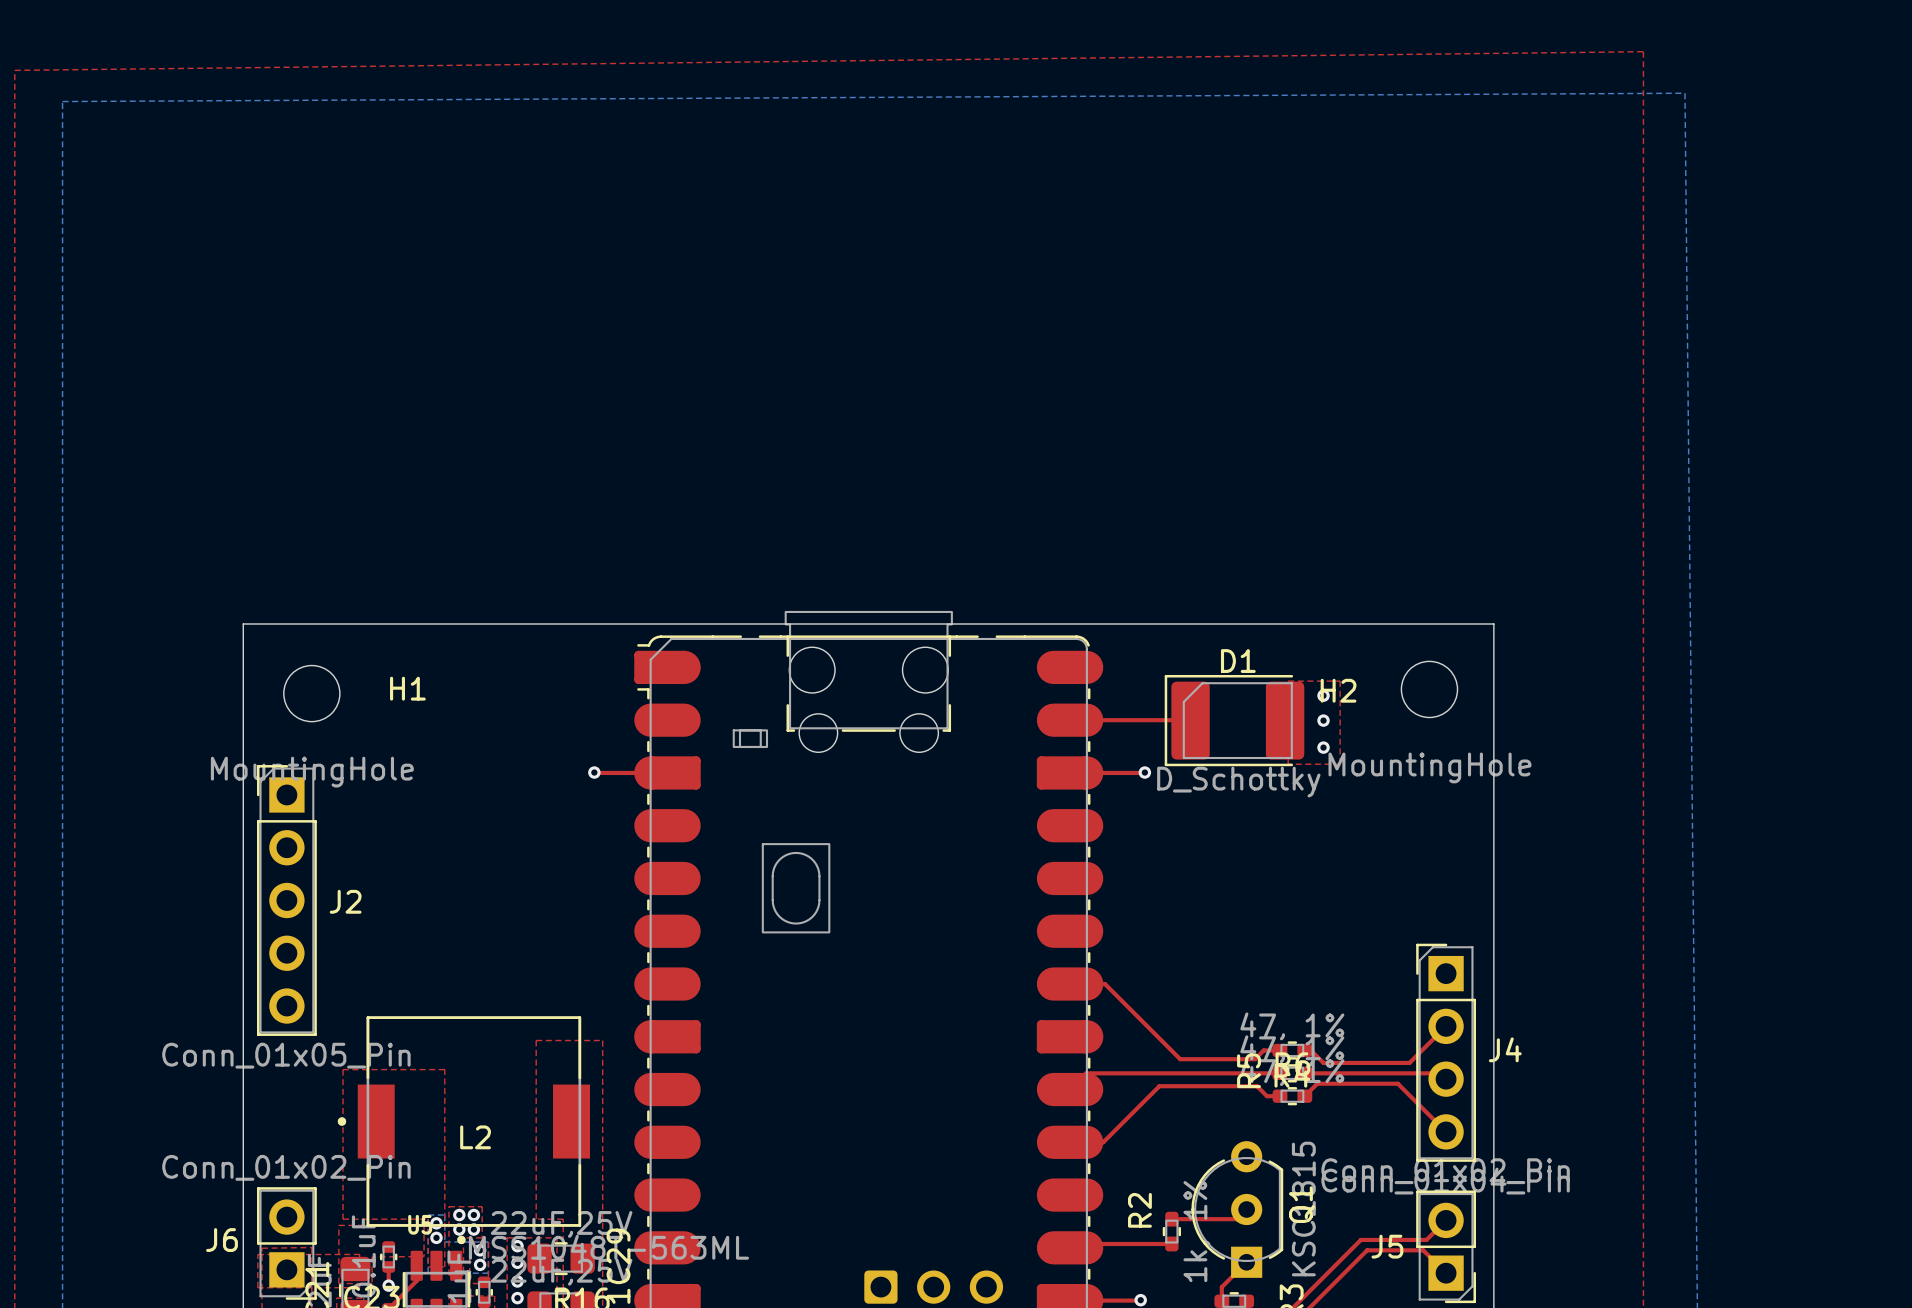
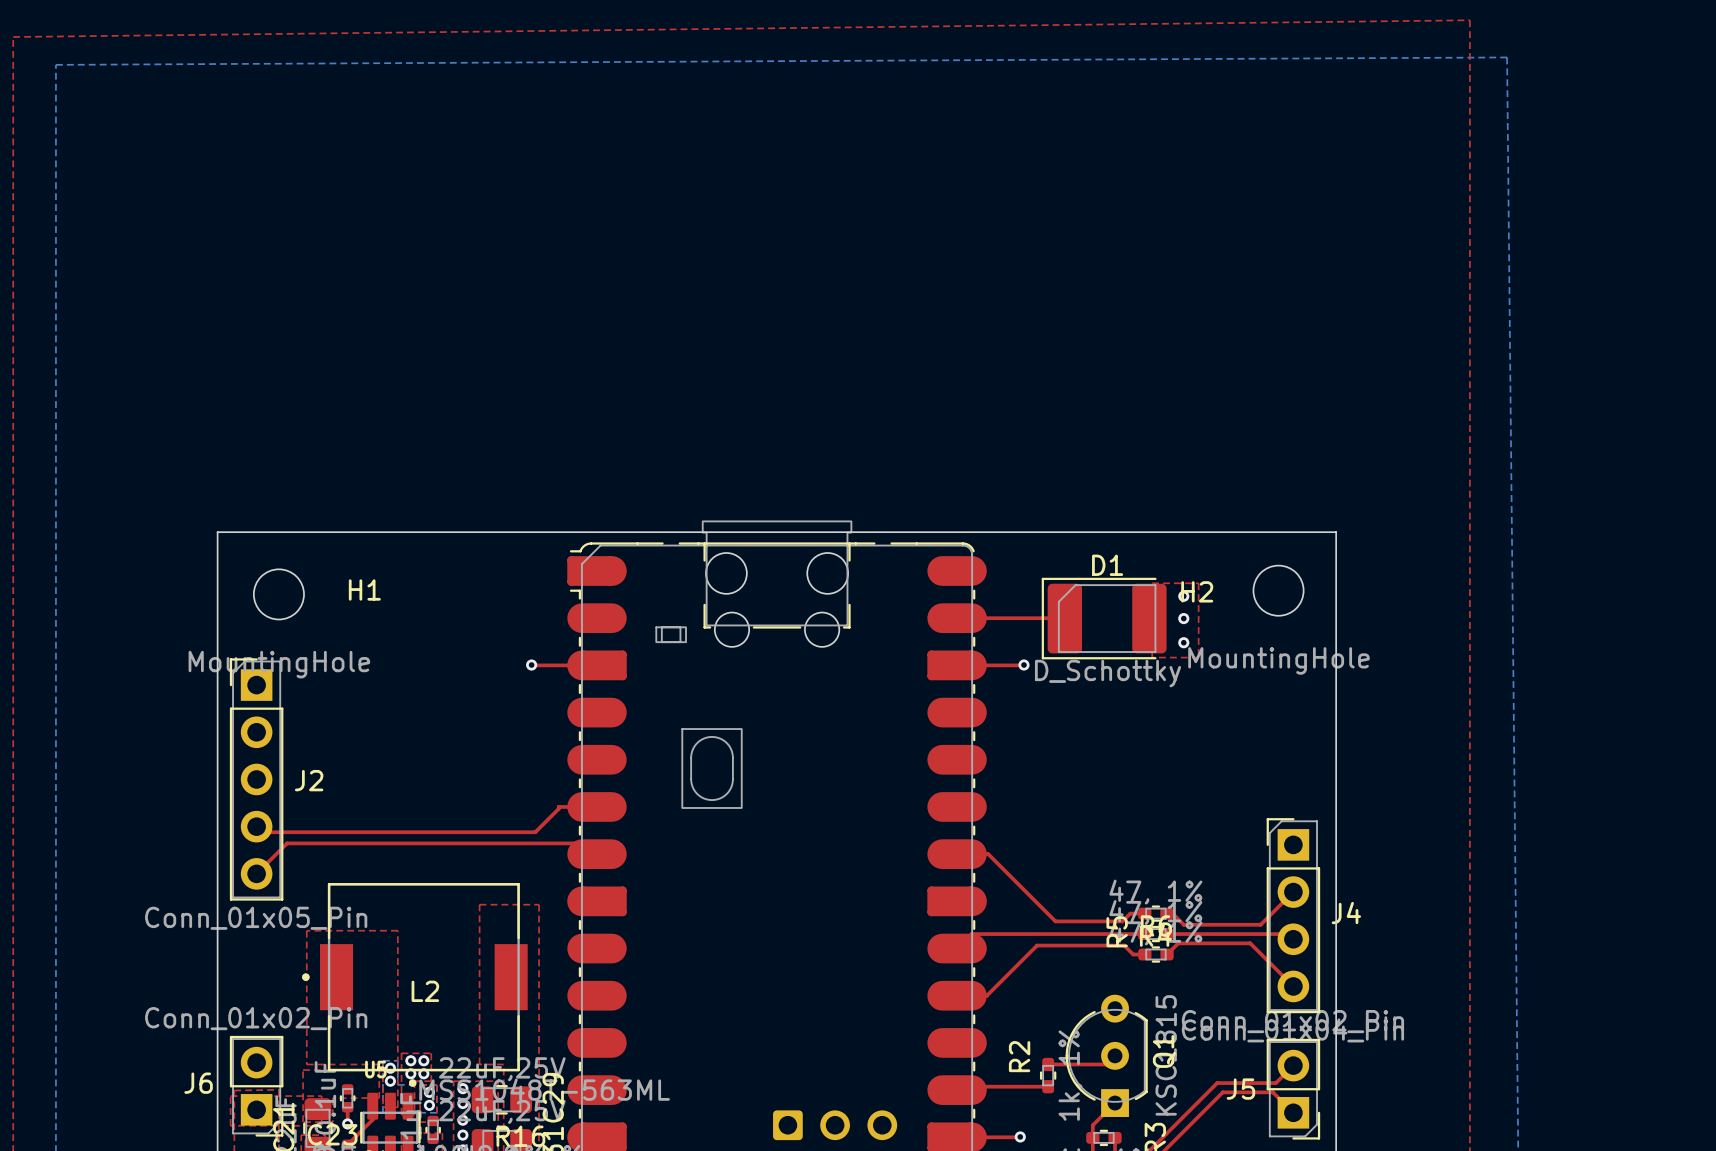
top track: none -> (597, 806) (558, 806) (535, 832) (262, 832) (256, 826)
top track: none -> (597, 854) (586, 843) (287, 843) (256, 873)

